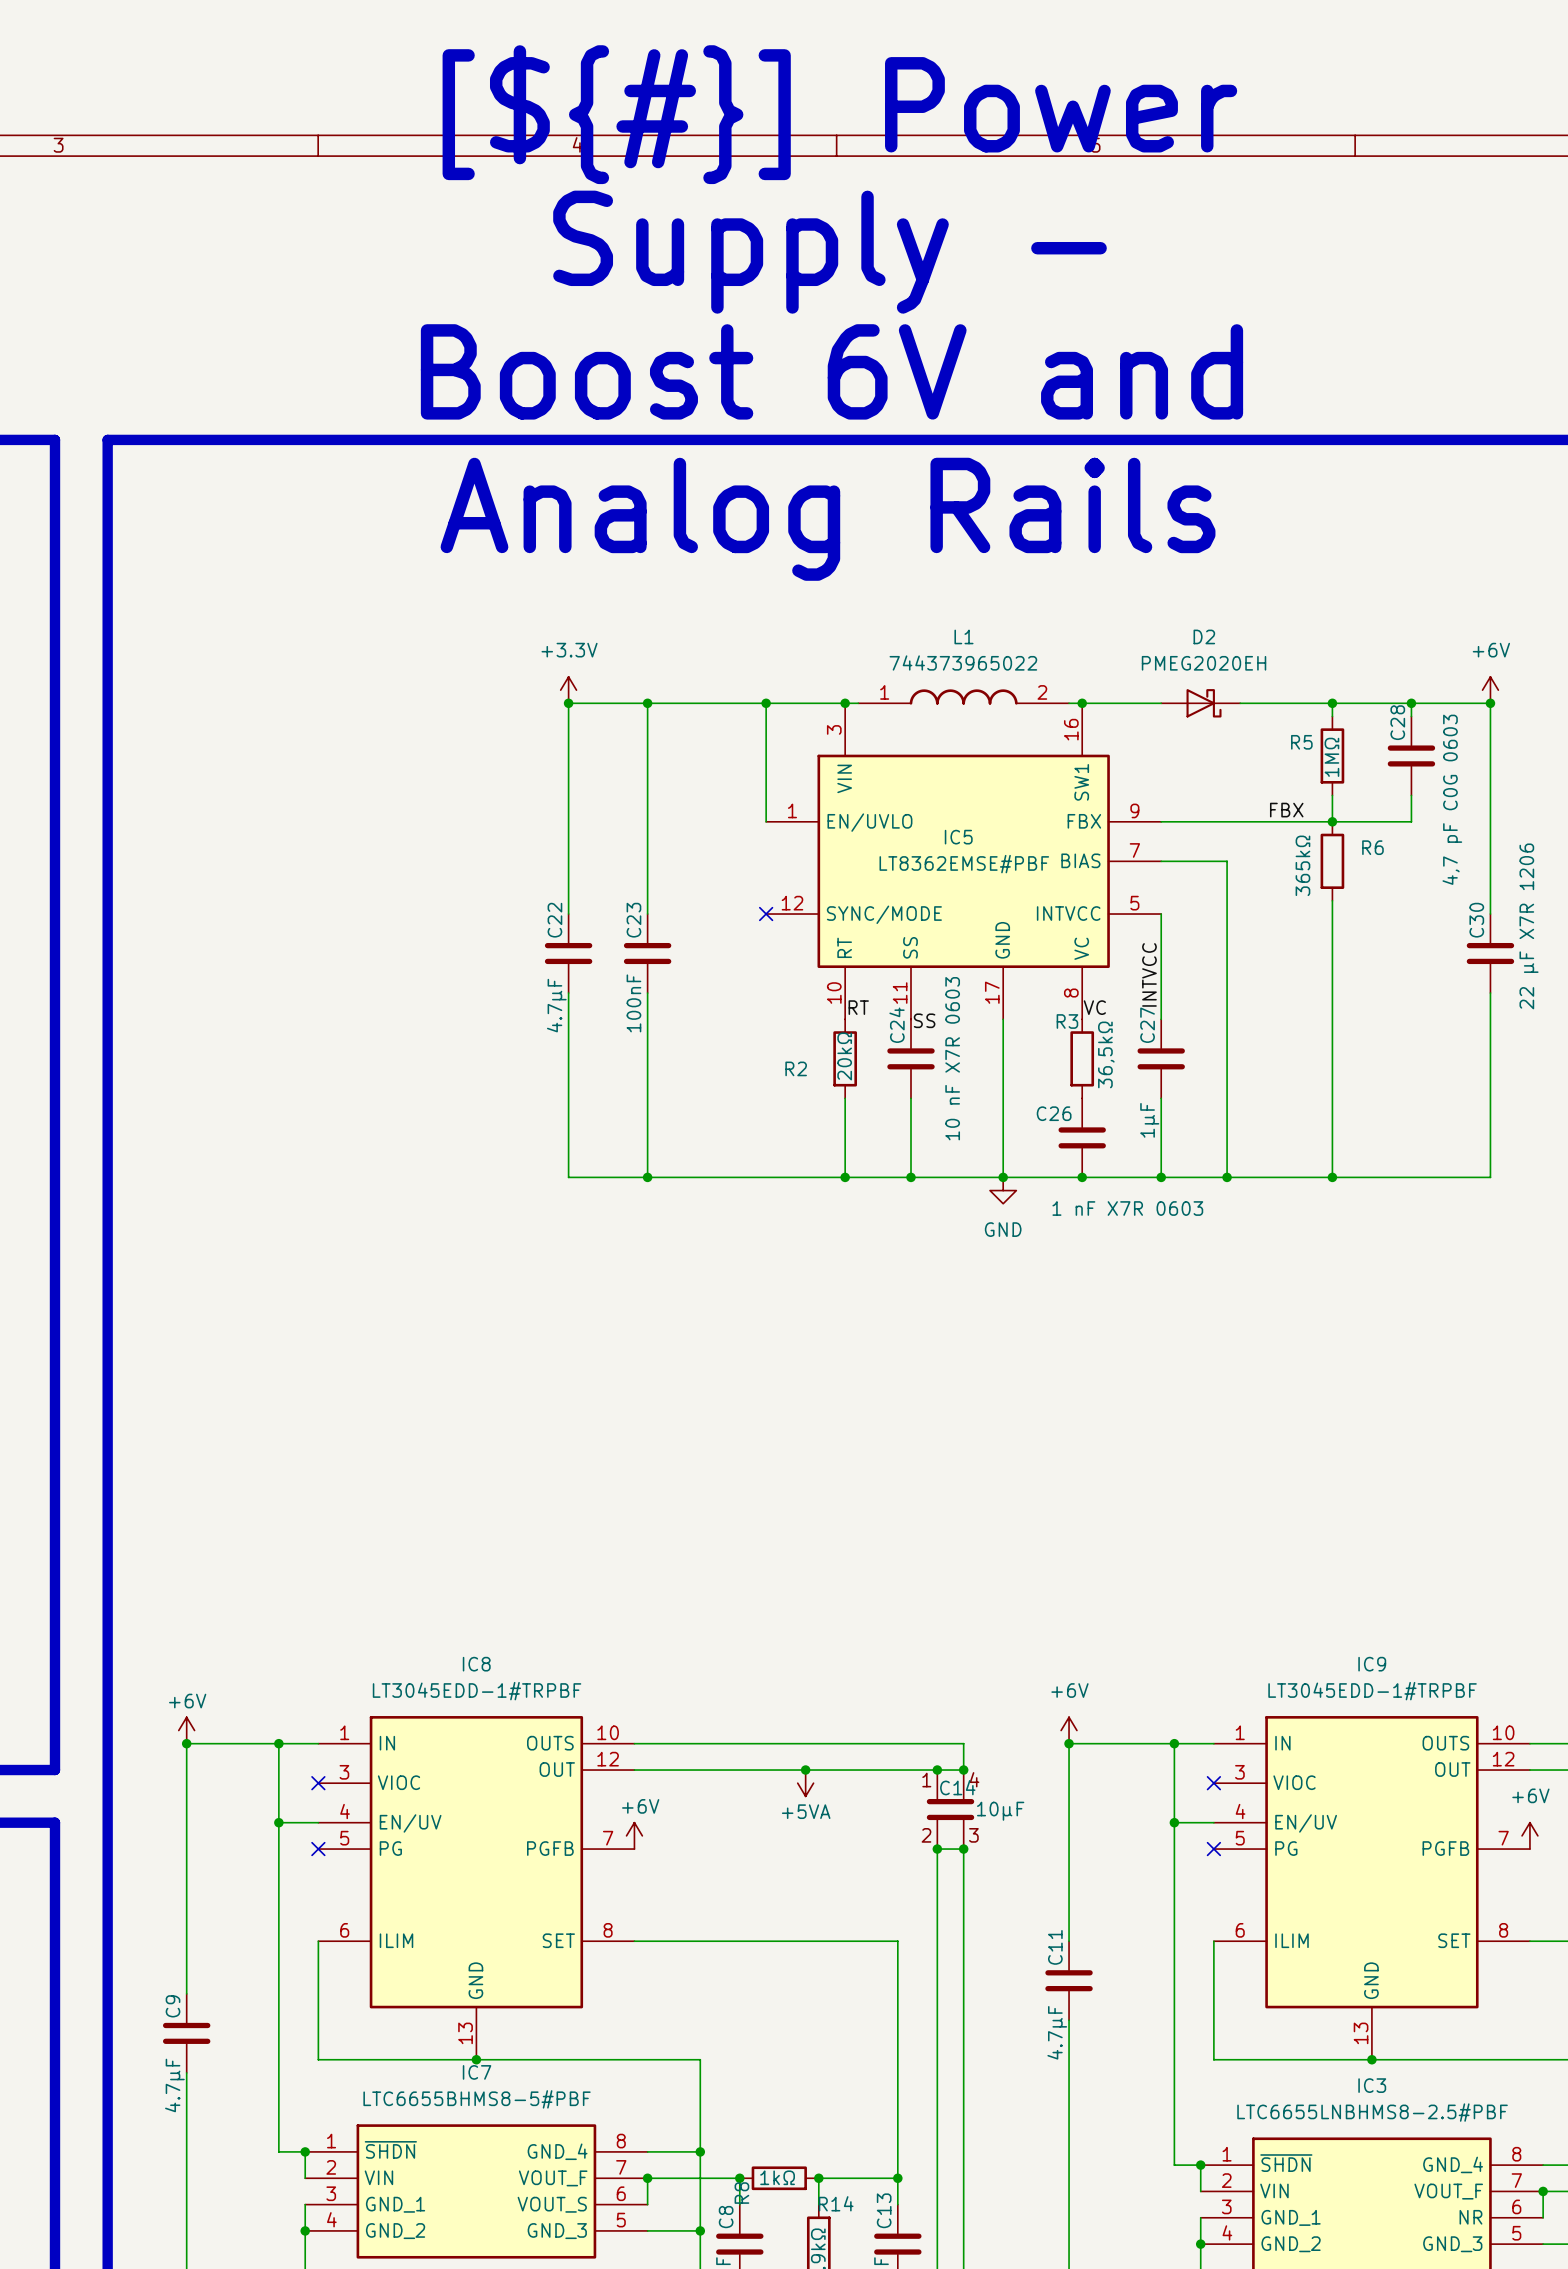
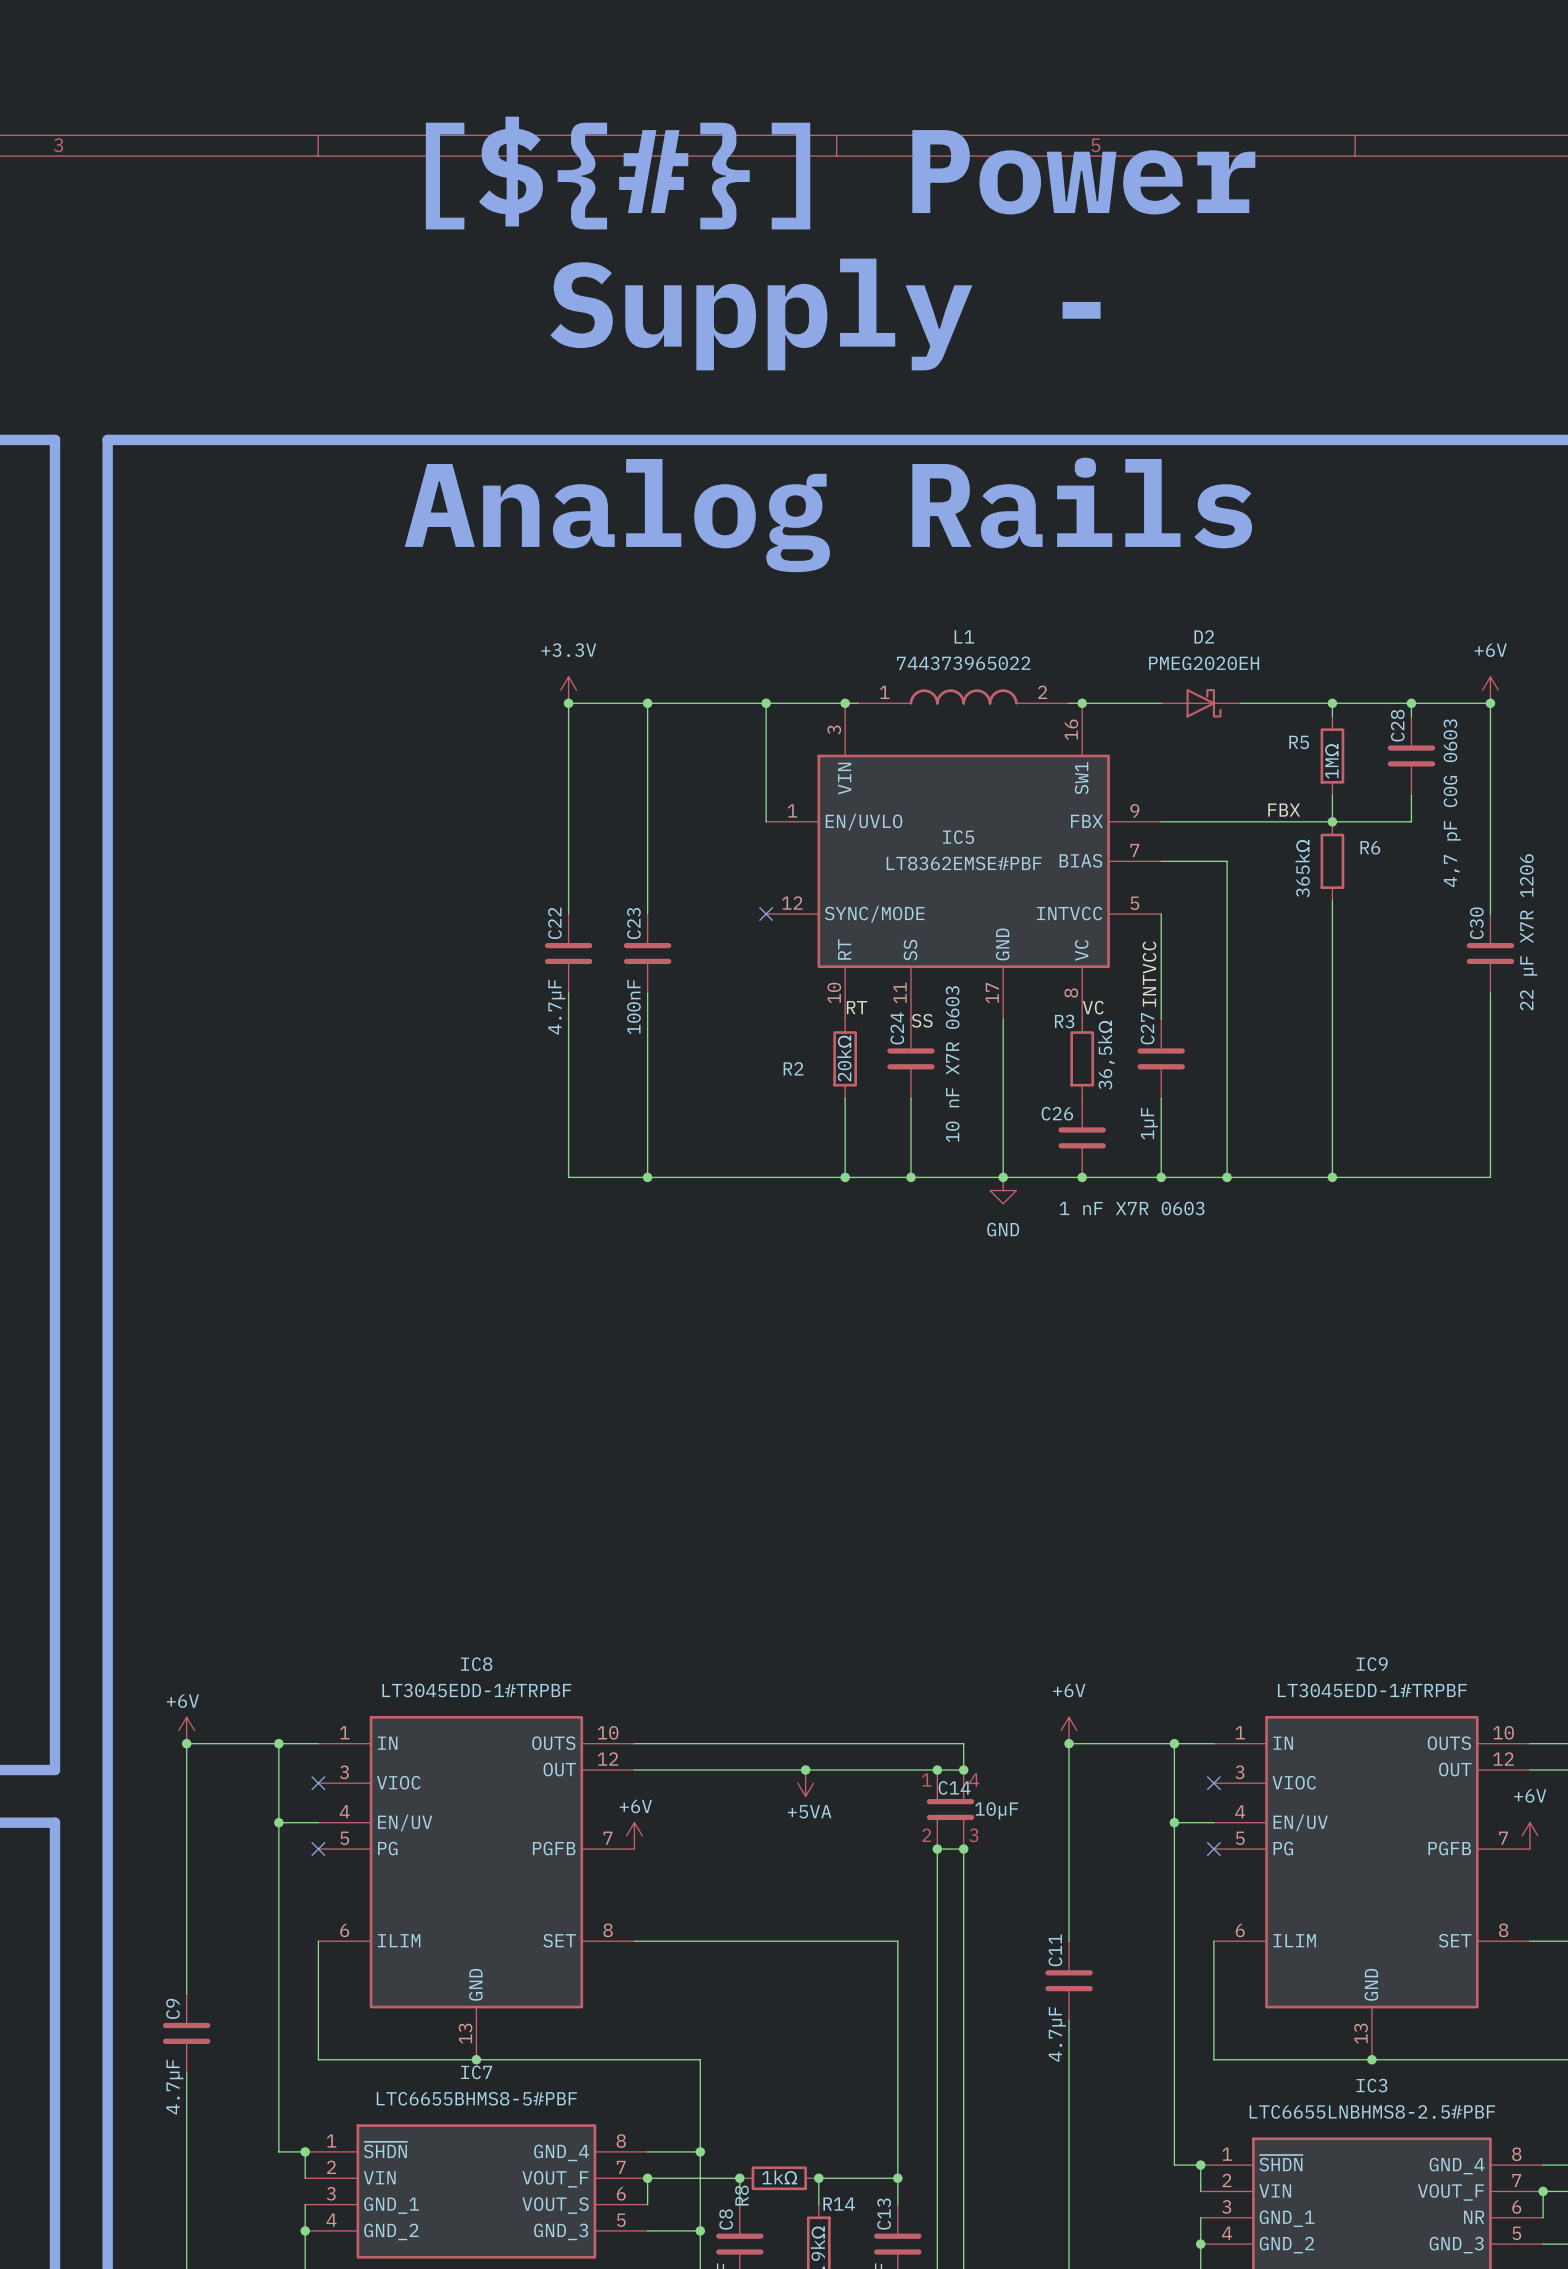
text position: [${#}] Power (839, 114) -> [${#}] Power (840, 173)
text position: Supply - (830, 252) -> Supply - (825, 314)
text: Boost 6V and (831, 371) -> none

